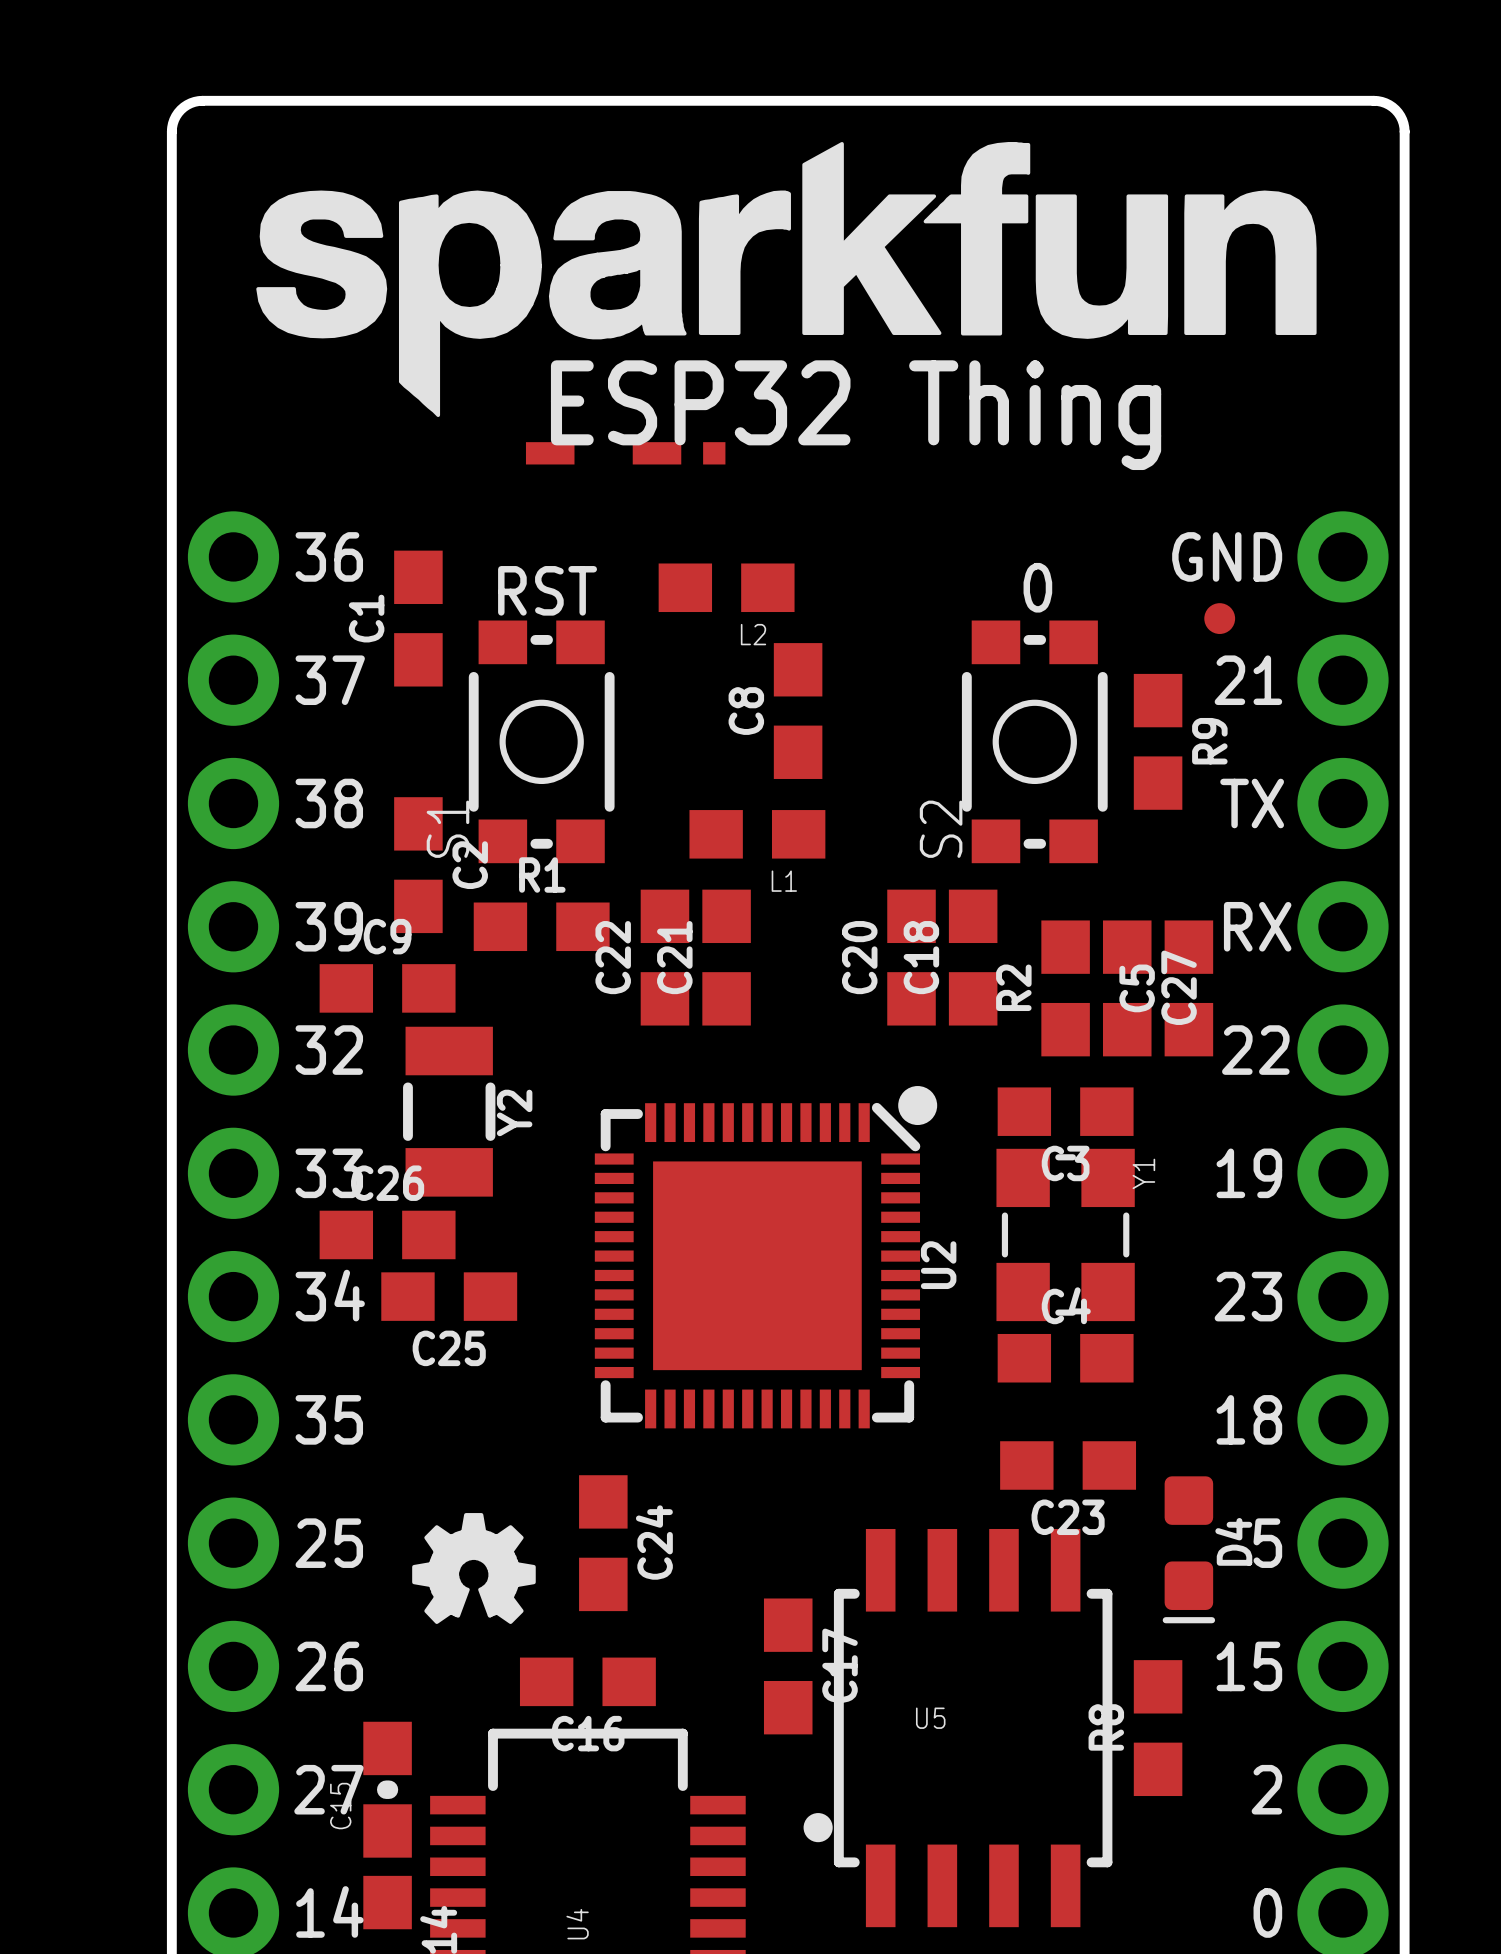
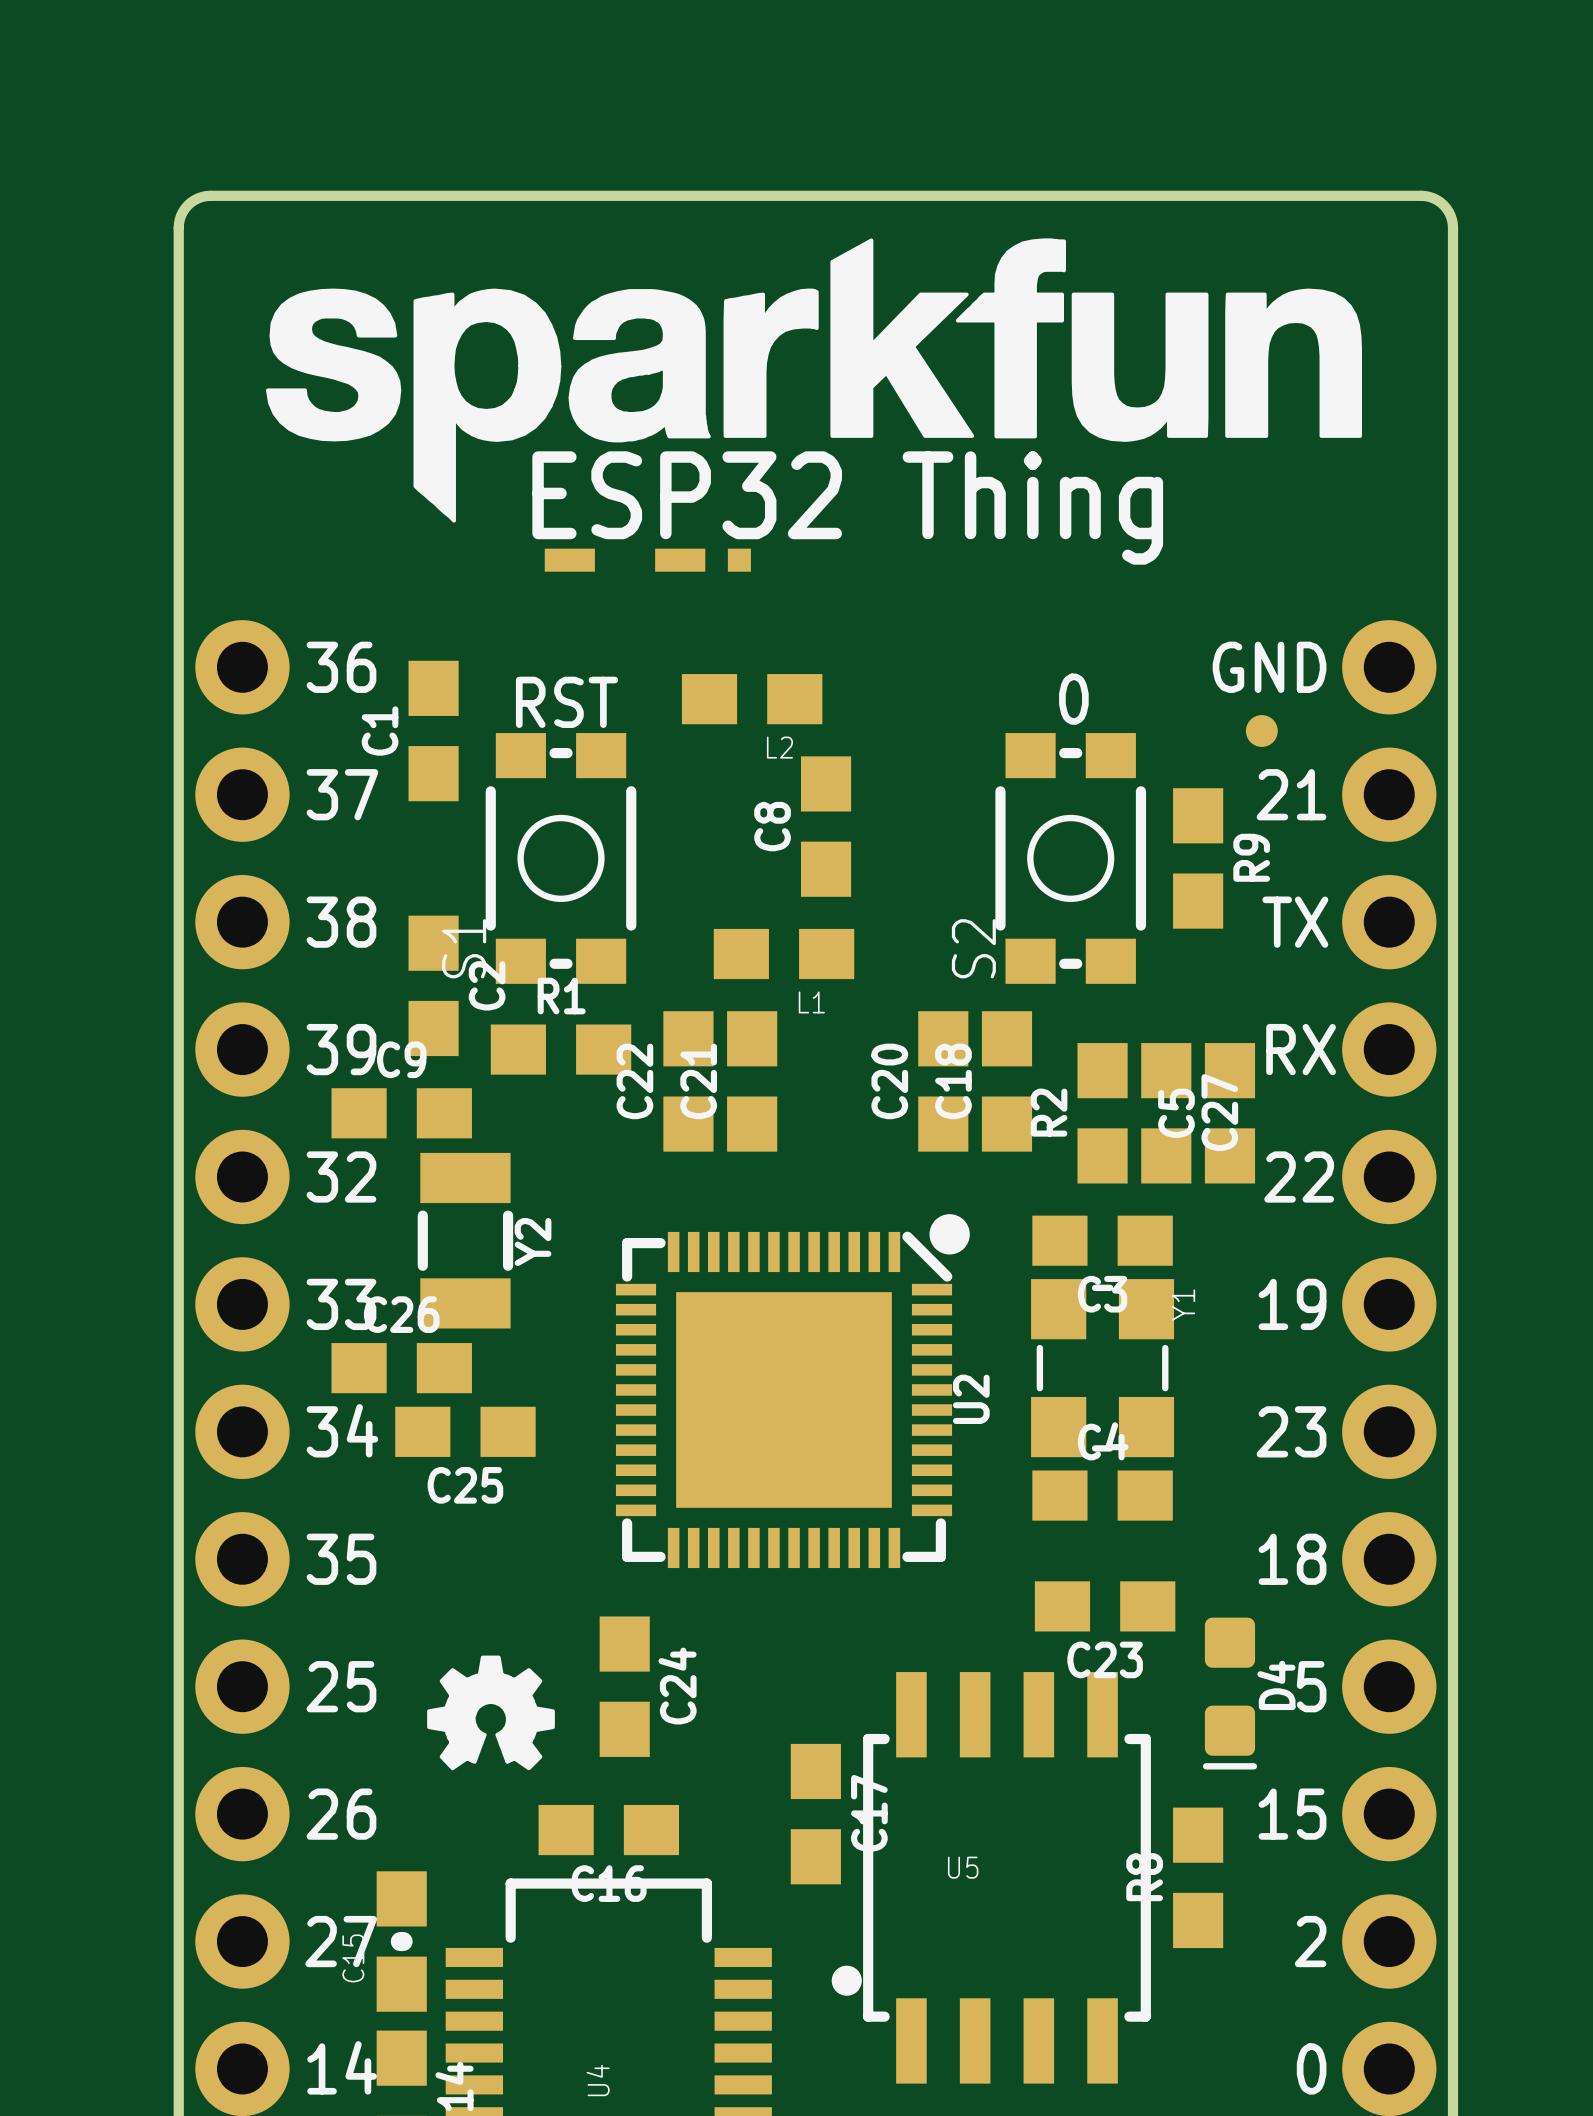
text position: ESP32 Thing (856, 415) -> ESP32 Thing (847, 508)

